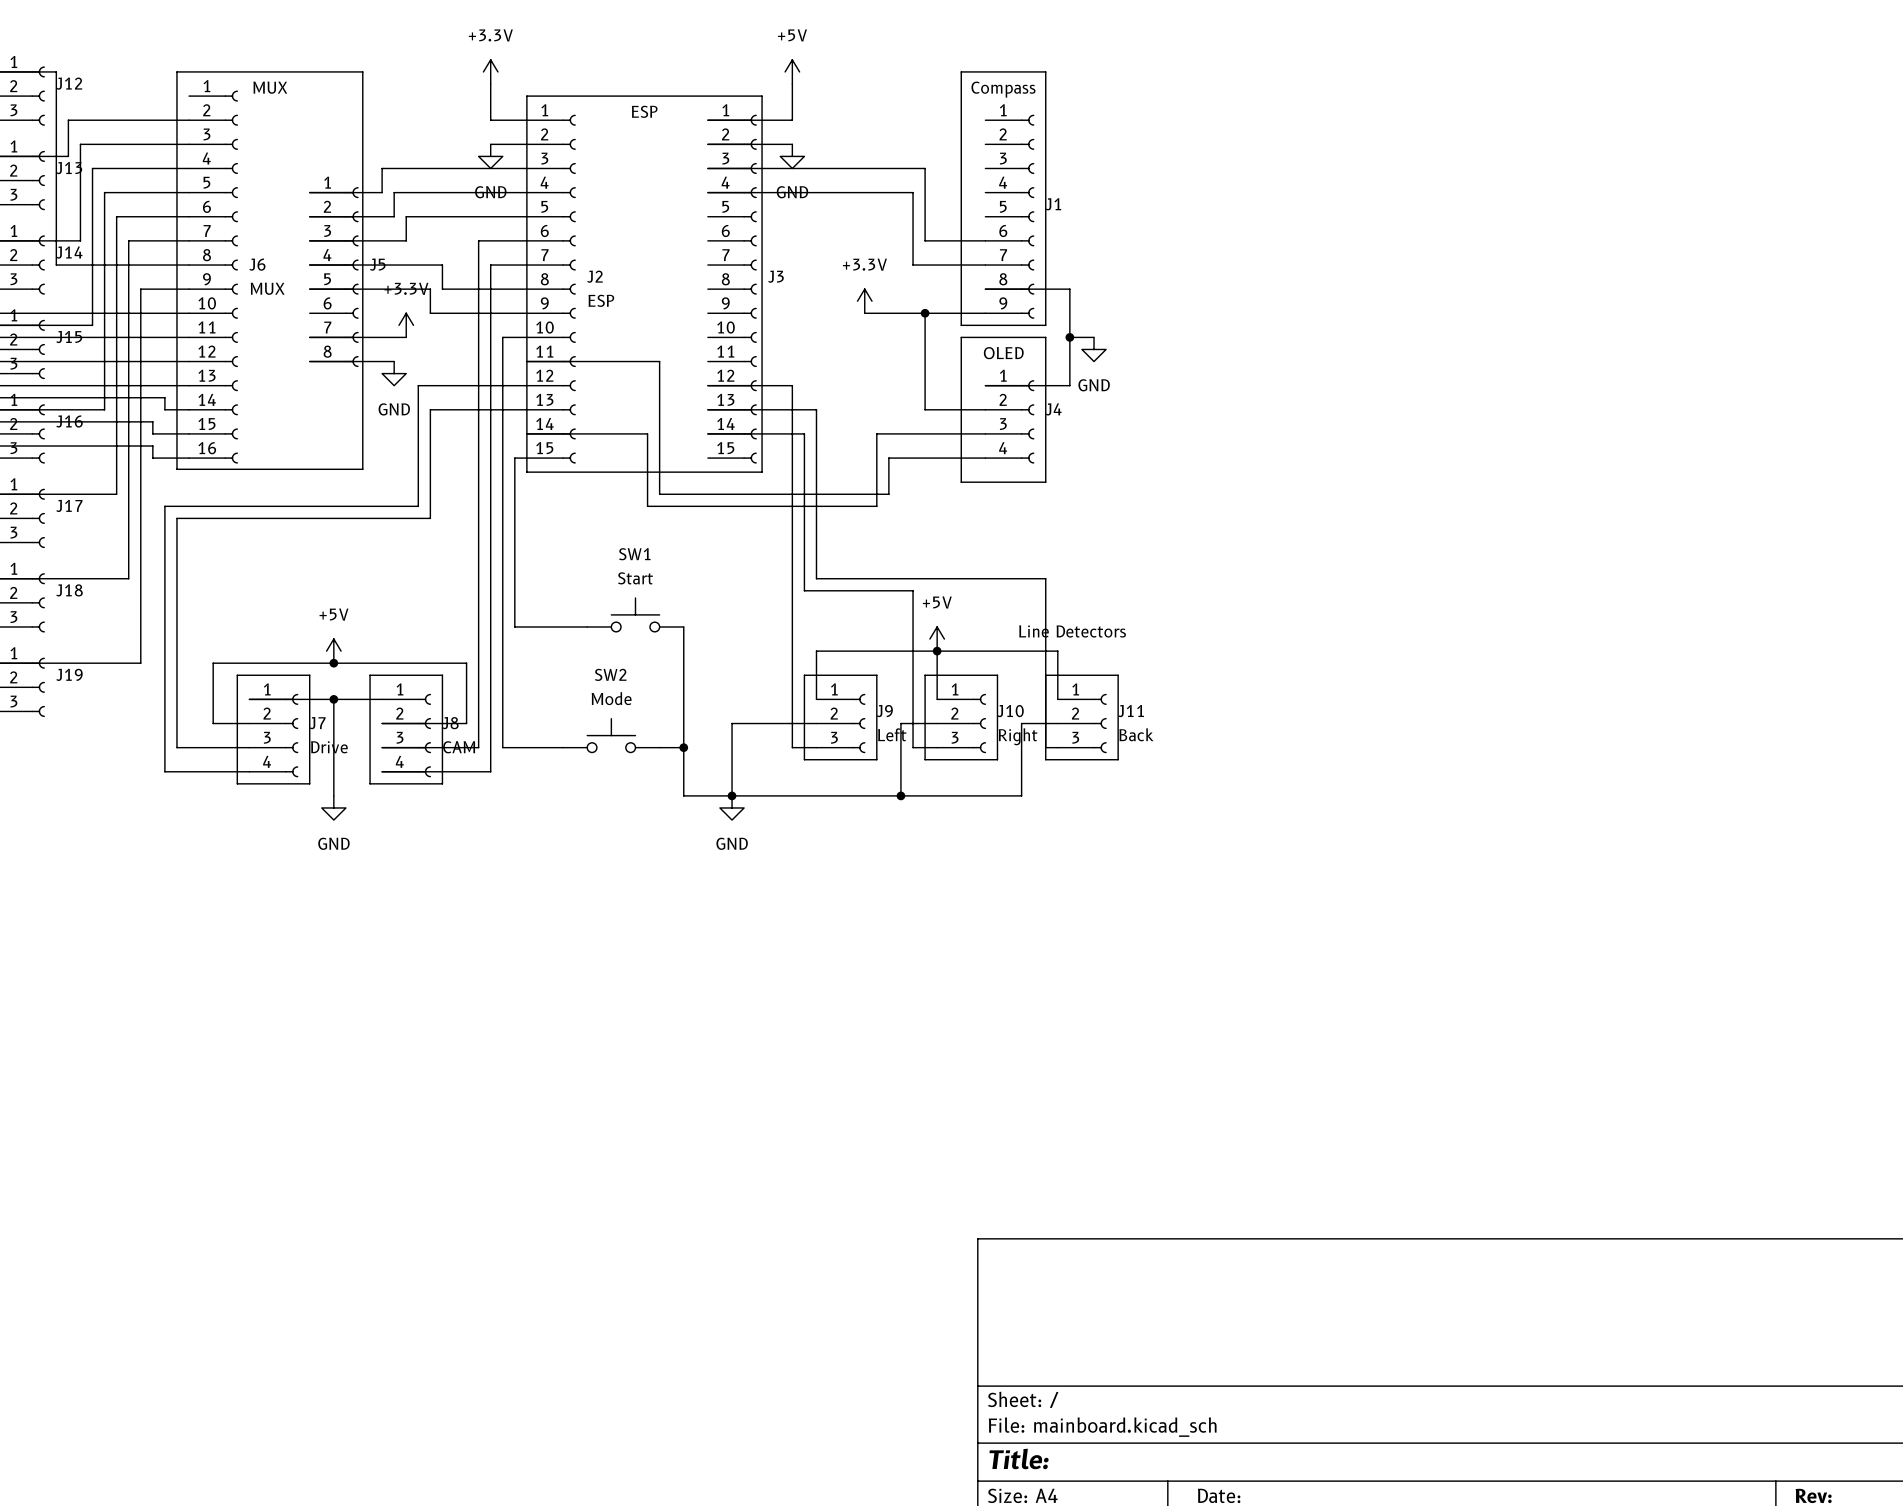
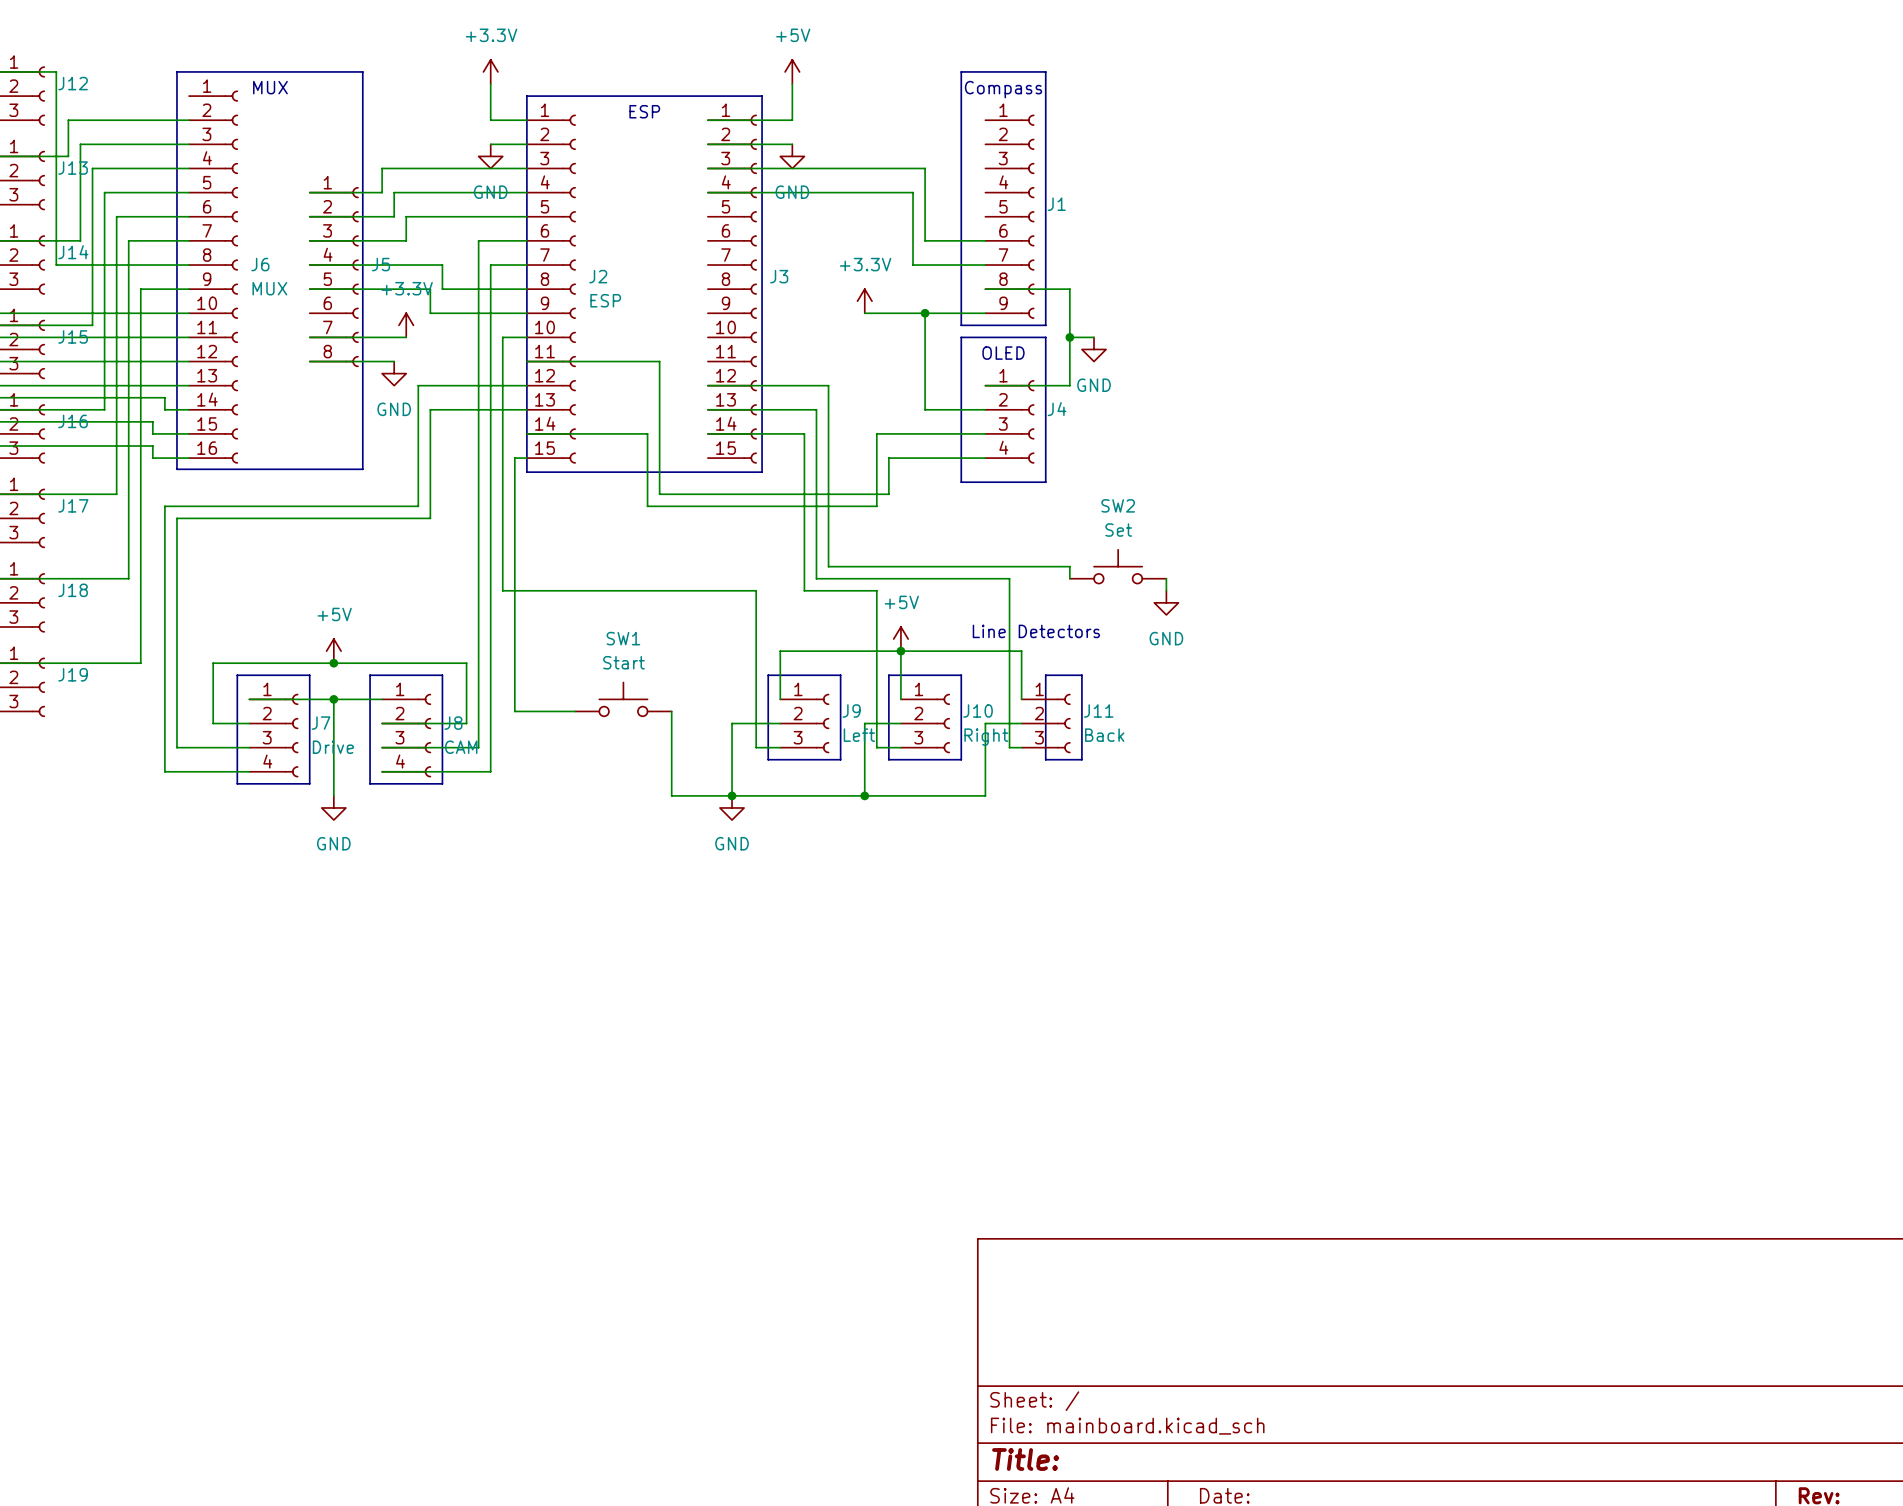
wire: (792, 385) (792, 747) (816, 747) -> (792, 385) (828, 385) (828, 566) (1069, 566) (1069, 578)
wire: (1009, 578) (1045, 578) (1045, 747) (1057, 747) -> (1009, 578) (1009, 747) (1021, 747)
wire: none -> (1166, 578) (1166, 590)
wire: (502, 590) (502, 747) (563, 747) -> (502, 590) (756, 590) (756, 747) (780, 747)
wire: (876, 590) (913, 590) (913, 747) (937, 747) -> (876, 590) (876, 747) (900, 747)
power symbol: none -> GND (1166, 602)
SW1 position: (635, 614) -> (623, 699)
wire: (514, 626) (587, 626) -> (514, 626) (514, 711) (575, 711)
wire: (683, 626) (683, 795) -> (671, 711) (671, 795) (683, 795)
text position: Line Detectors (1072, 631) -> Line Detectors (1036, 631)
power symbol position: +5V (937, 639) -> +5V (900, 639)
wire: (816, 651) (816, 699) -> (816, 651) (780, 651) (780, 699)
wire: (937, 651) (937, 699) -> (900, 651) (900, 699)
junction position: (937, 651) -> (900, 651)
wire: (1021, 651) (1057, 651) (1057, 699) -> (1021, 651) (1021, 699)
line: (804, 675) (804, 759) -> (804, 675) (768, 675) (768, 759) (804, 759)
line: (840, 675) (876, 675) (876, 759) (840, 759) -> (840, 675) (840, 759)
line: (925, 675) (925, 759) -> (925, 675) (888, 675) (888, 759) (925, 759)
line: (961, 675) (997, 675) (997, 759) (961, 759) -> (961, 675) (961, 759)
line: (1081, 675) (1118, 675) (1118, 759) (1081, 759) -> (1081, 675) (1081, 759)
SW2 value: Mode (611, 698) -> Set (1118, 530)
J9 position: (840, 723) -> (804, 723)
wire: (937, 723) (900, 723) (900, 795) -> (900, 723) (864, 723) (864, 795)
J10 position: (961, 723) -> (925, 723)
wire: (1057, 723) (1021, 723) (1021, 795) (985, 795) -> (1021, 723) (985, 723) (985, 795)
J11 position: (1082, 723) -> (1046, 723)
SW2 position: (611, 735) -> (1118, 566)
wire: (659, 747) (683, 747) -> none
junction: (683, 747) -> none
junction position: (900, 795) -> (864, 795)

